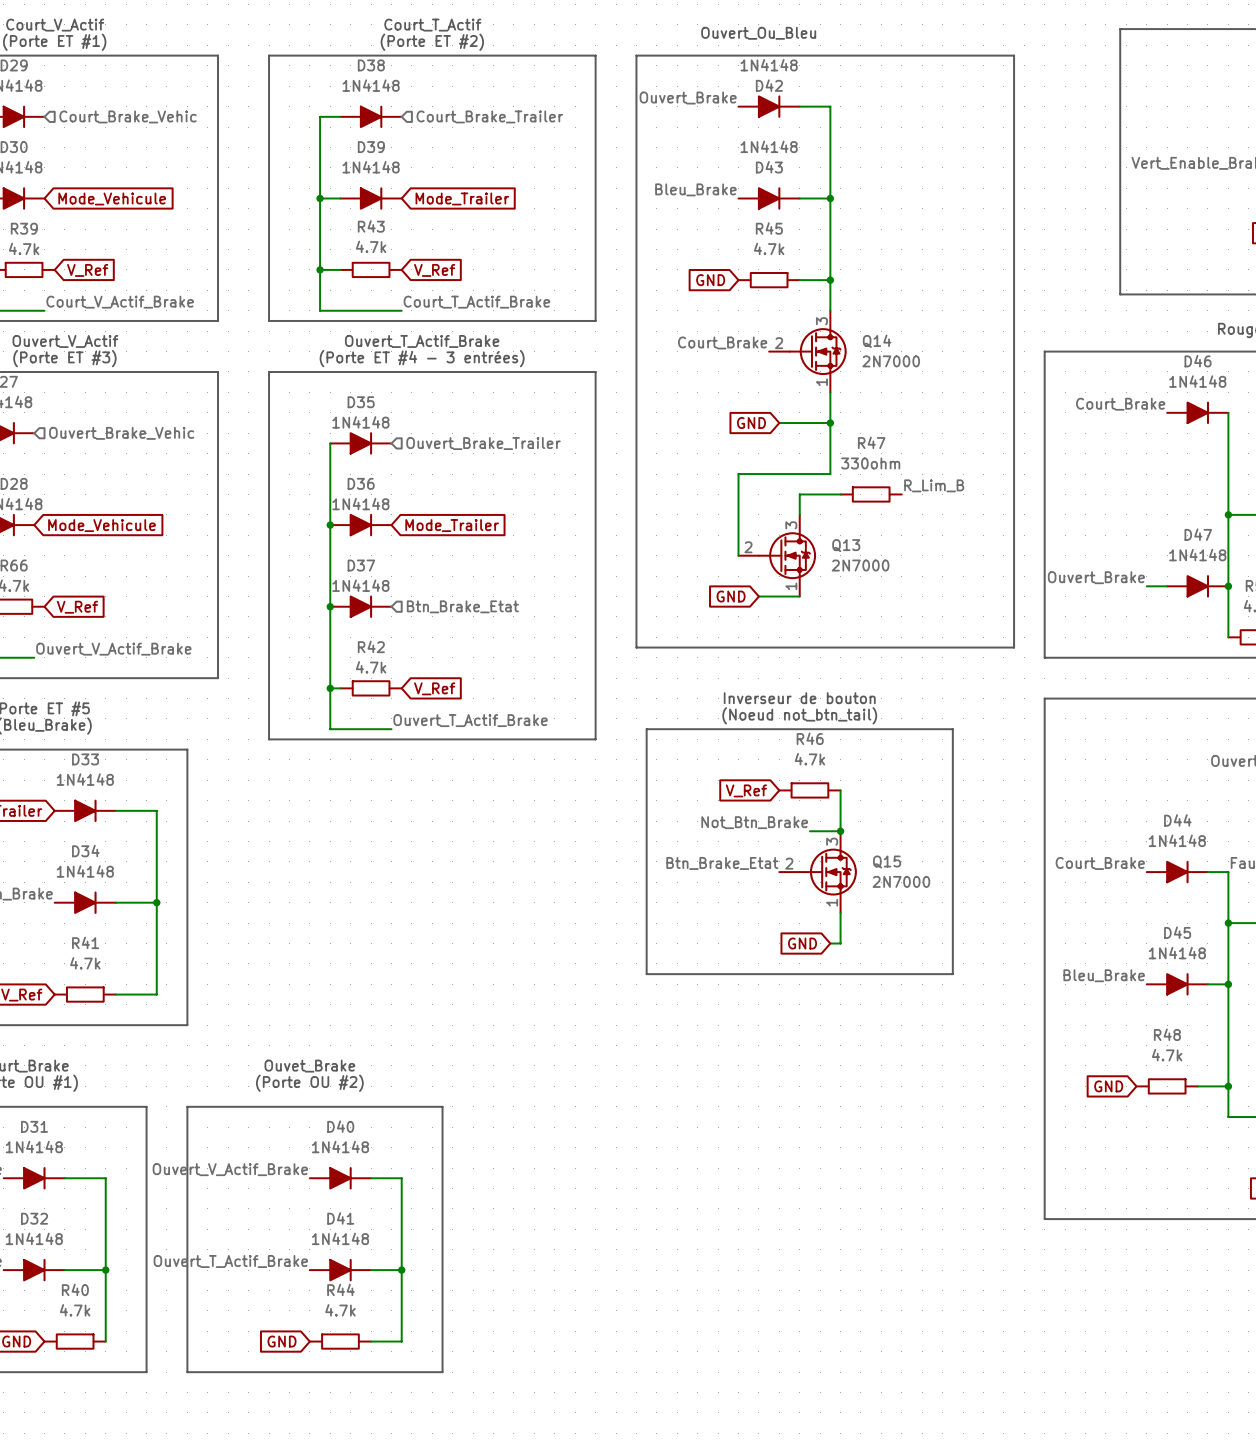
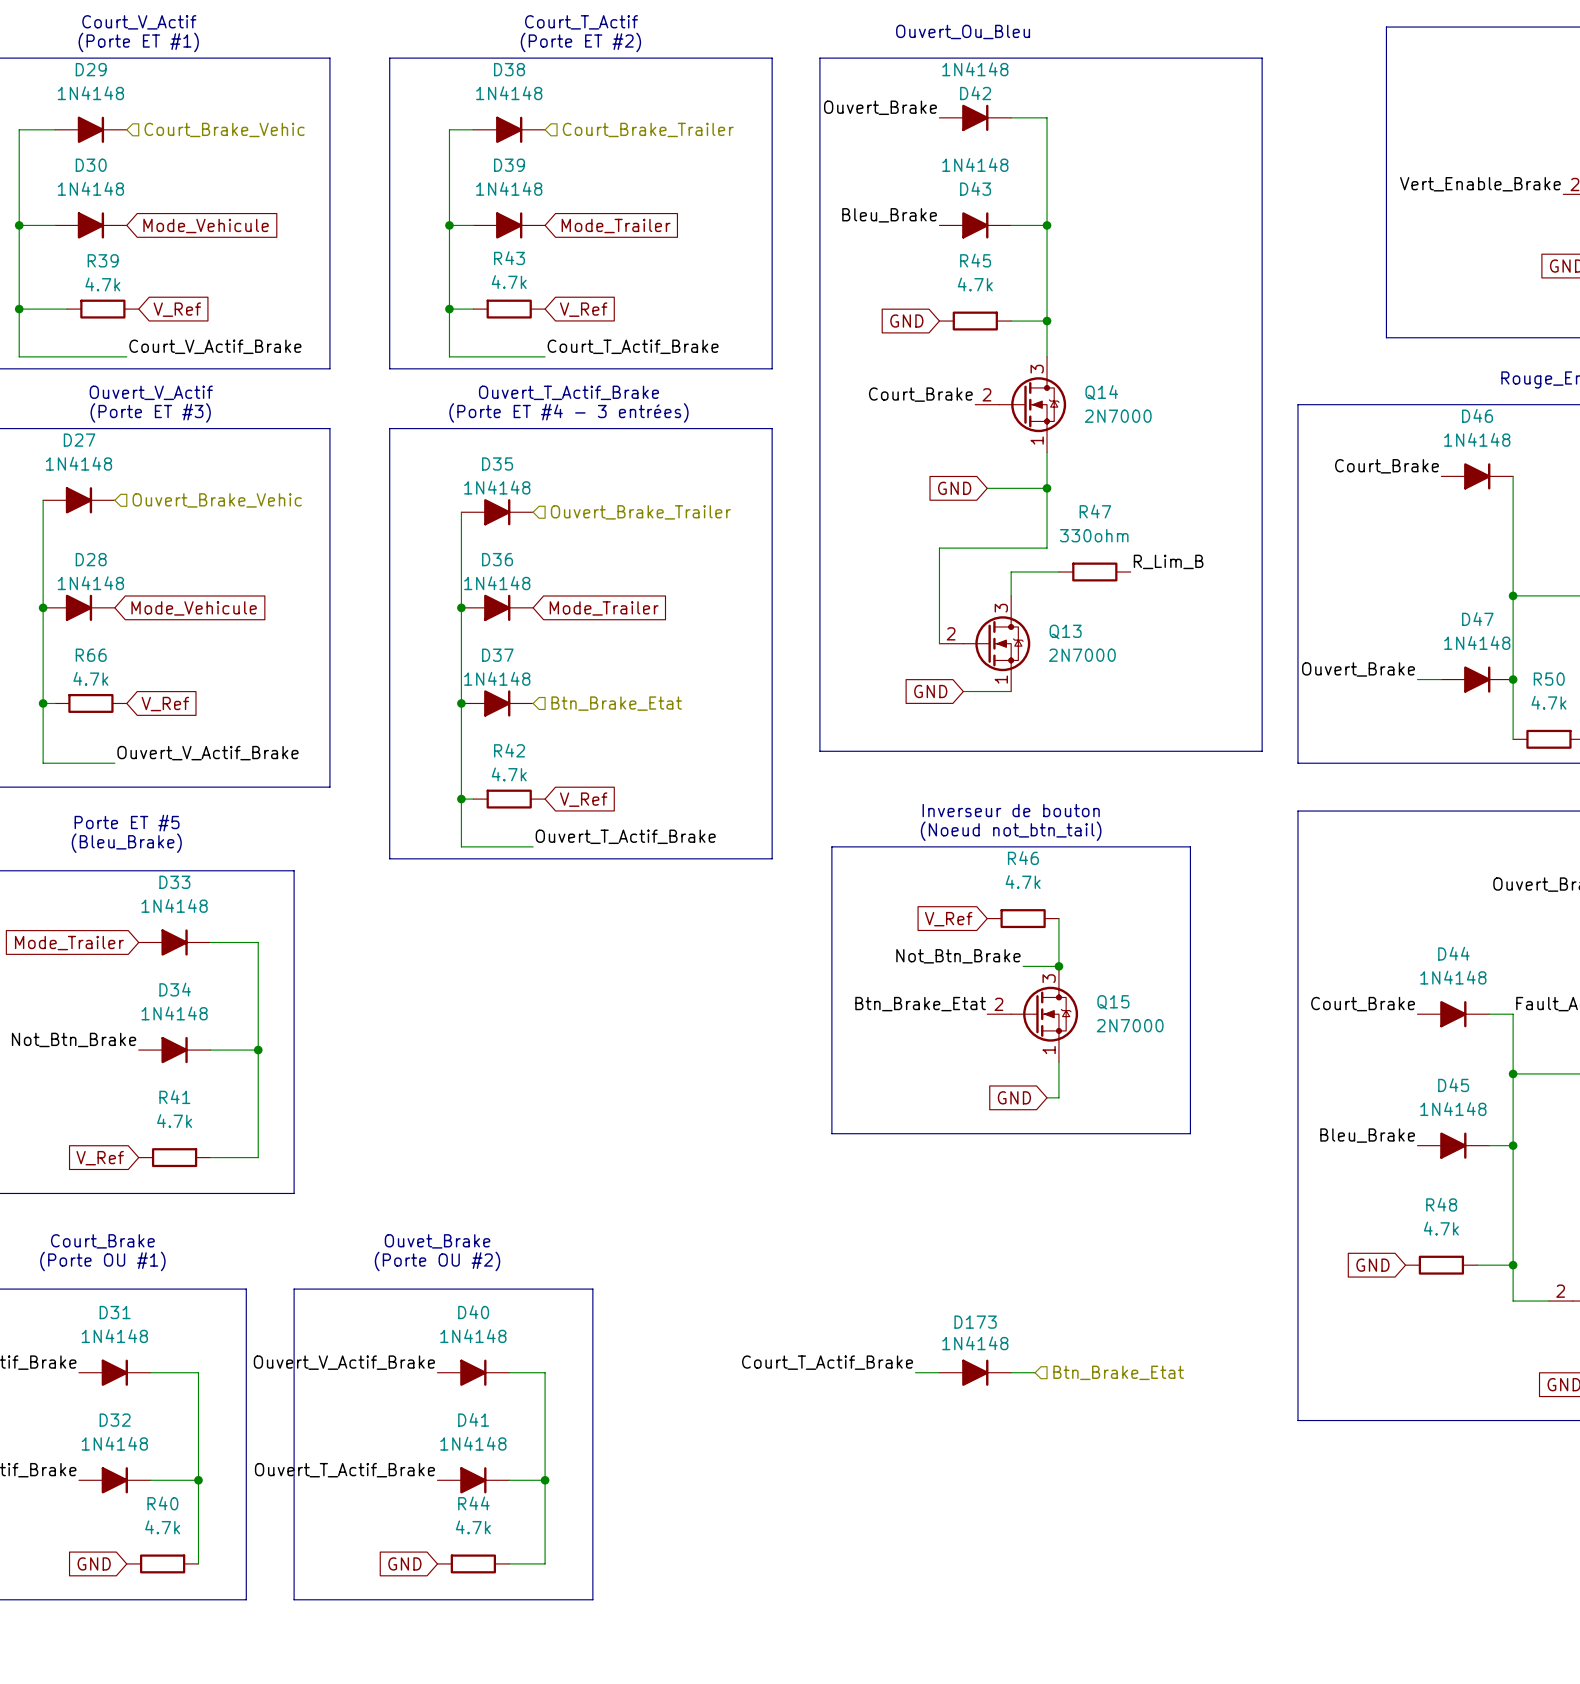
label: none -> Court_T_Actif_Brake (827, 1362)
wire: none -> (915, 1372) (939, 1372)
D173: none -> 1N4148 (975, 1372)
wire: none -> (1011, 1372) (1035, 1372)
hierarchical label: none -> Btn_Brake_Etat (1118, 1372)

